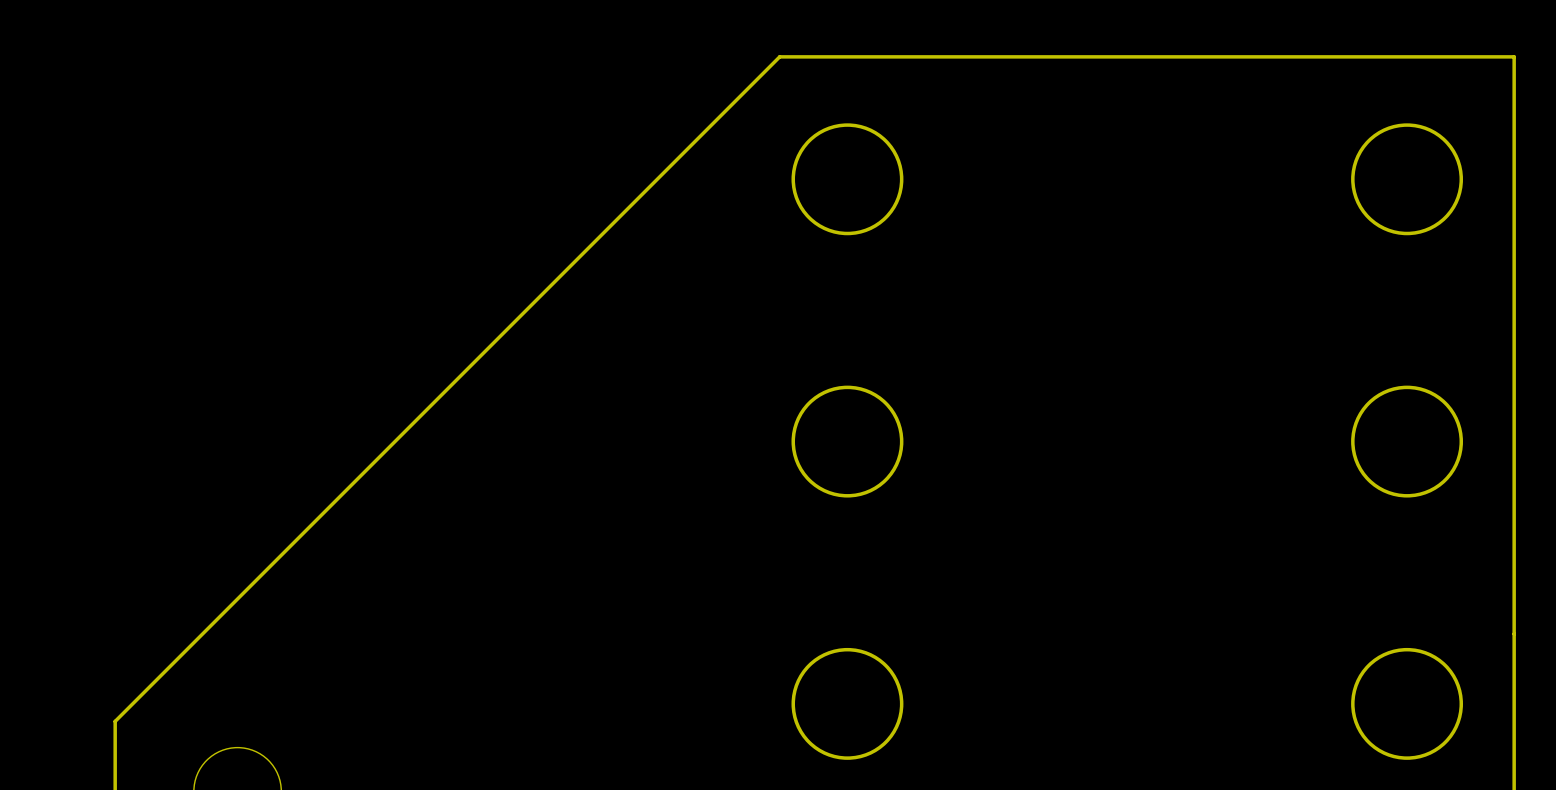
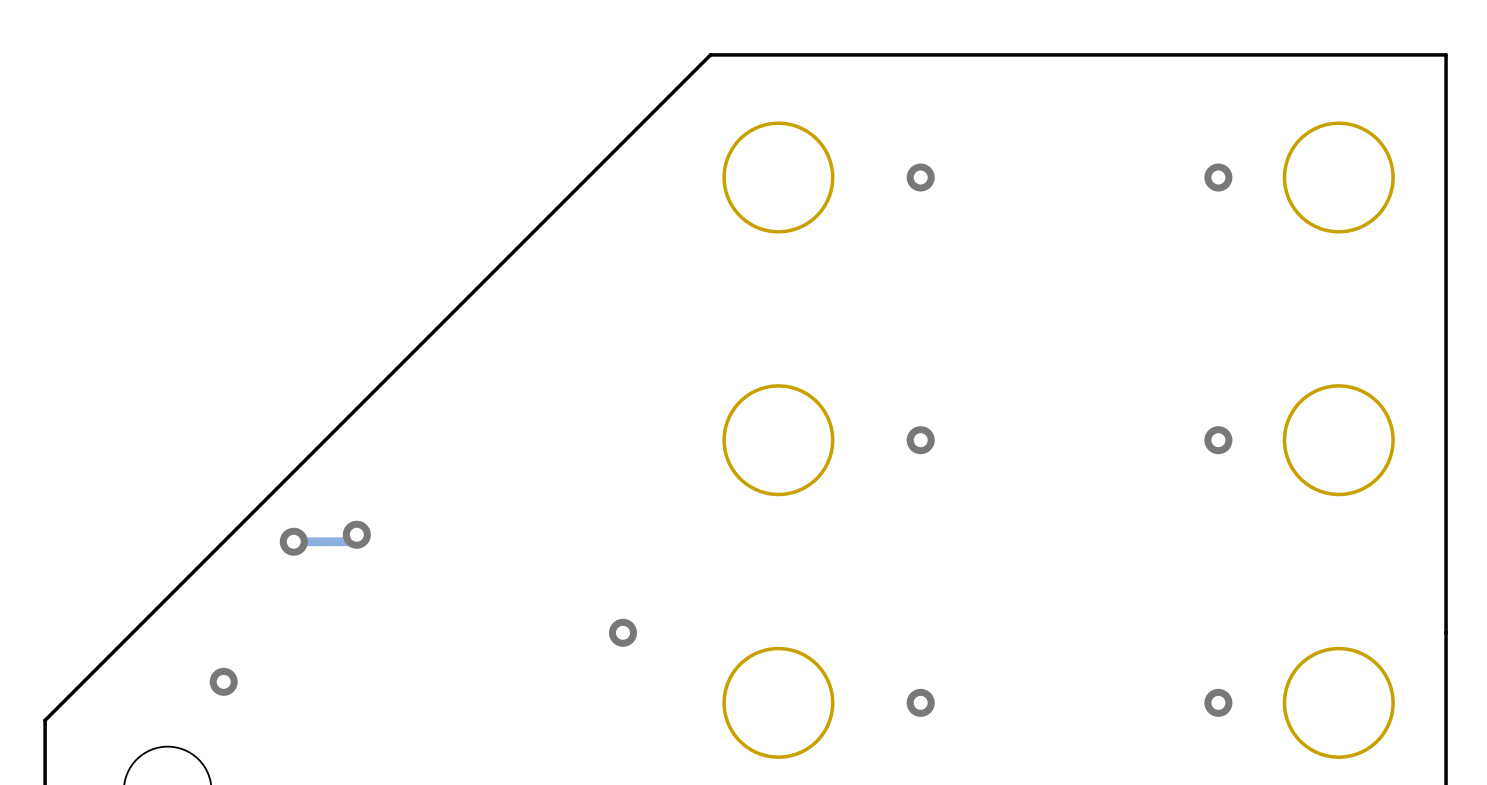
via: none -> (920, 177)
via: none -> (1218, 177)
via: none -> (920, 440)
via: none -> (1218, 440)
track: none -> (356, 534) (349, 541) (293, 541)
via: none -> (356, 534)
via: none -> (293, 541)
via: none -> (622, 632)
via: none -> (223, 681)
via: none -> (920, 702)
via: none -> (1218, 702)

